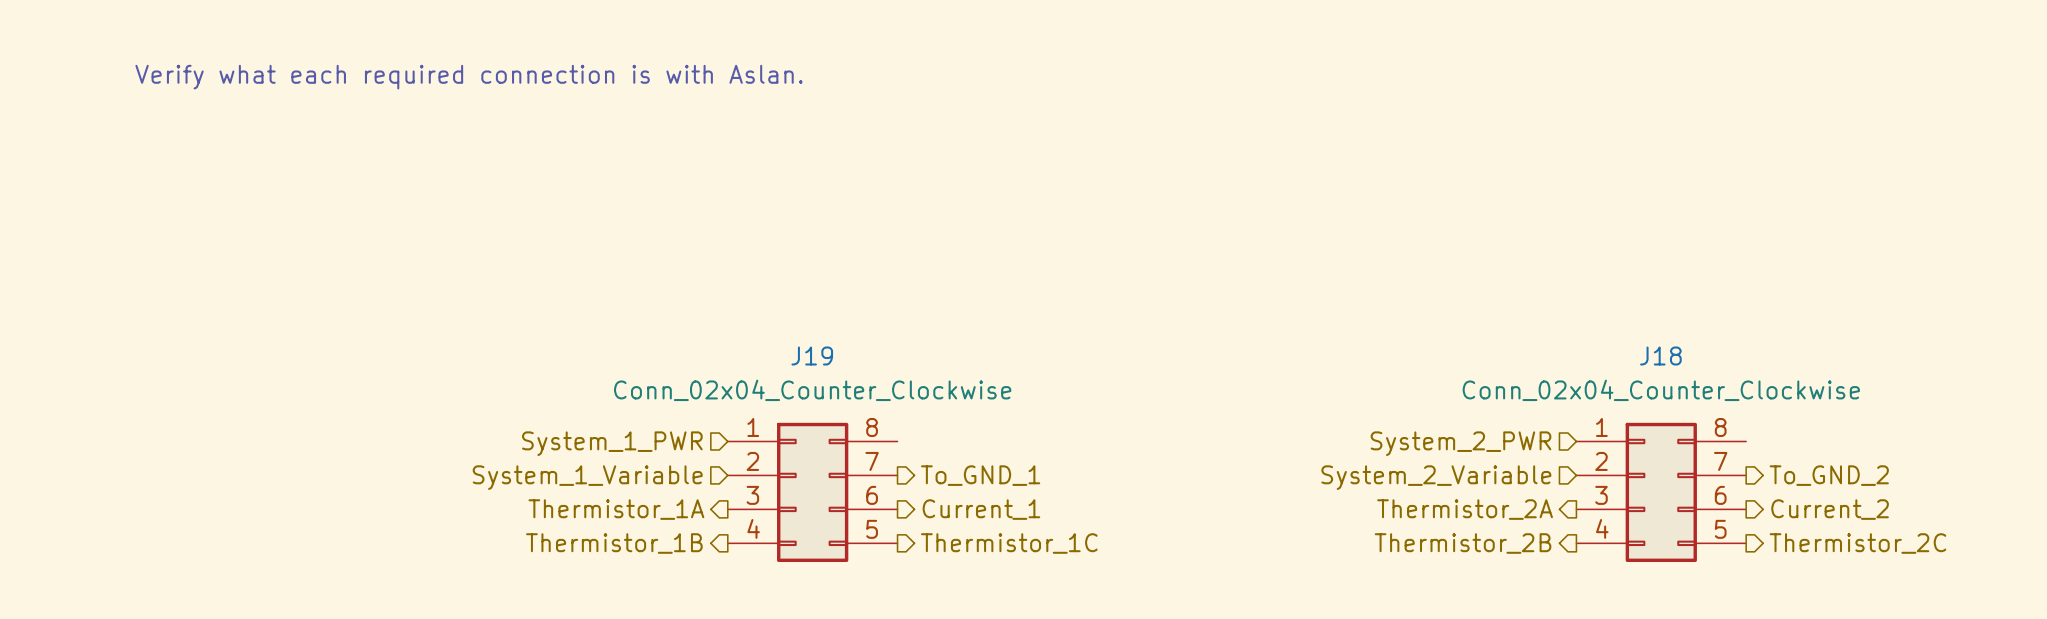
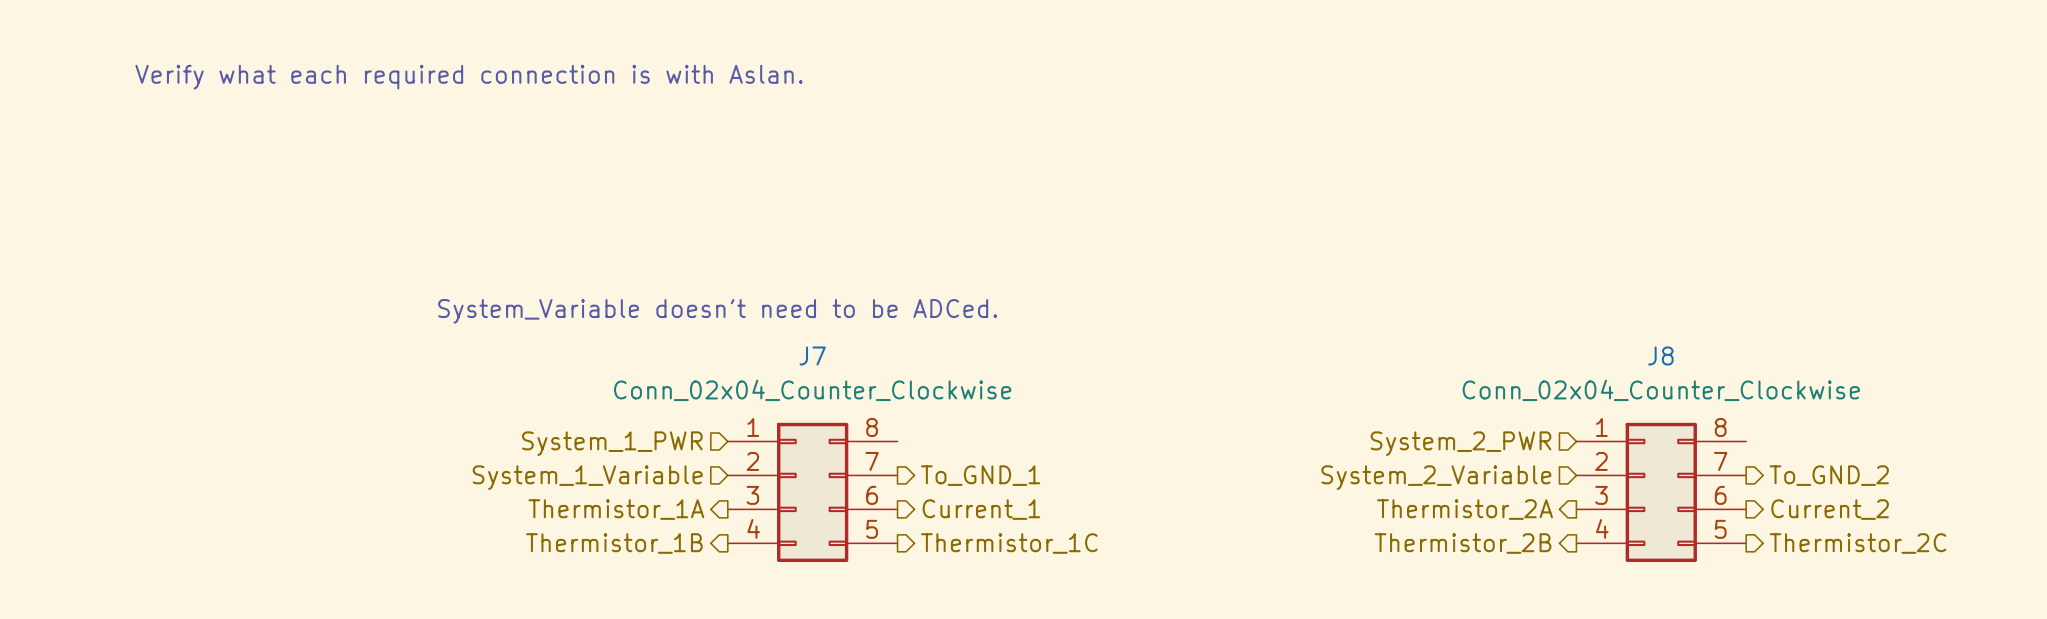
text: none -> System_Variable doesn't need to be ADCed. (717, 311)
J19 name: J19 (812, 356) -> J7 (812, 356)
J18 name: J18 (1660, 356) -> J8 (1660, 356)

